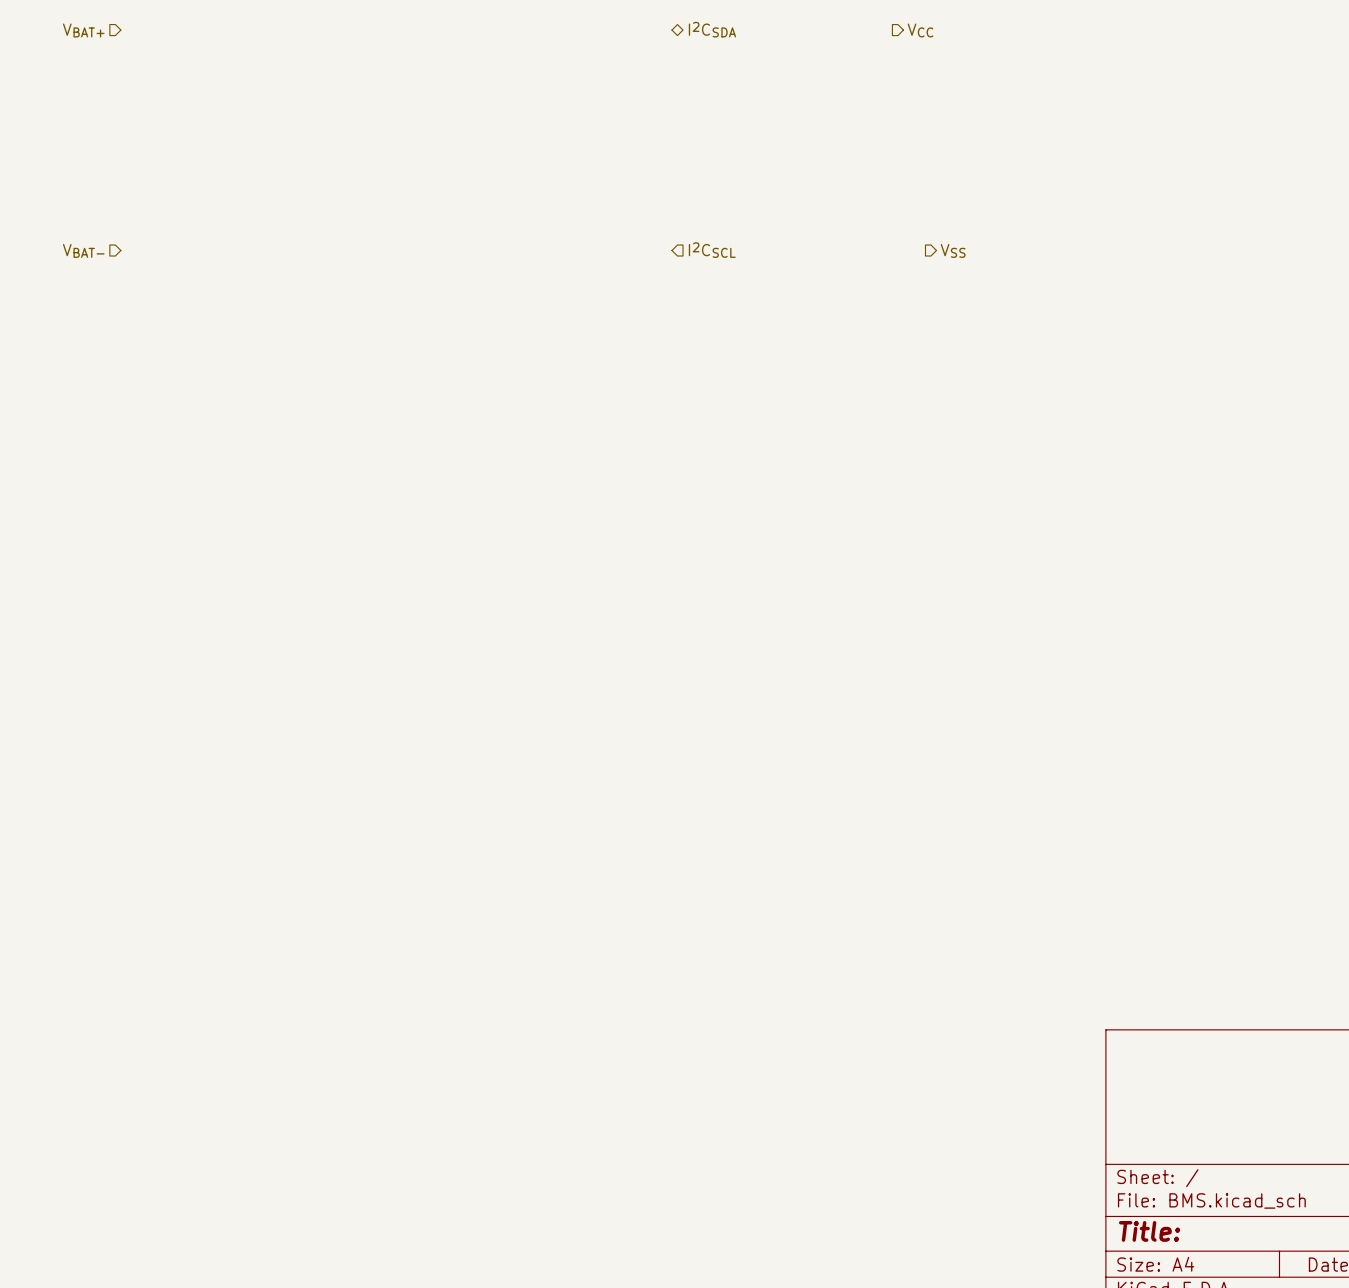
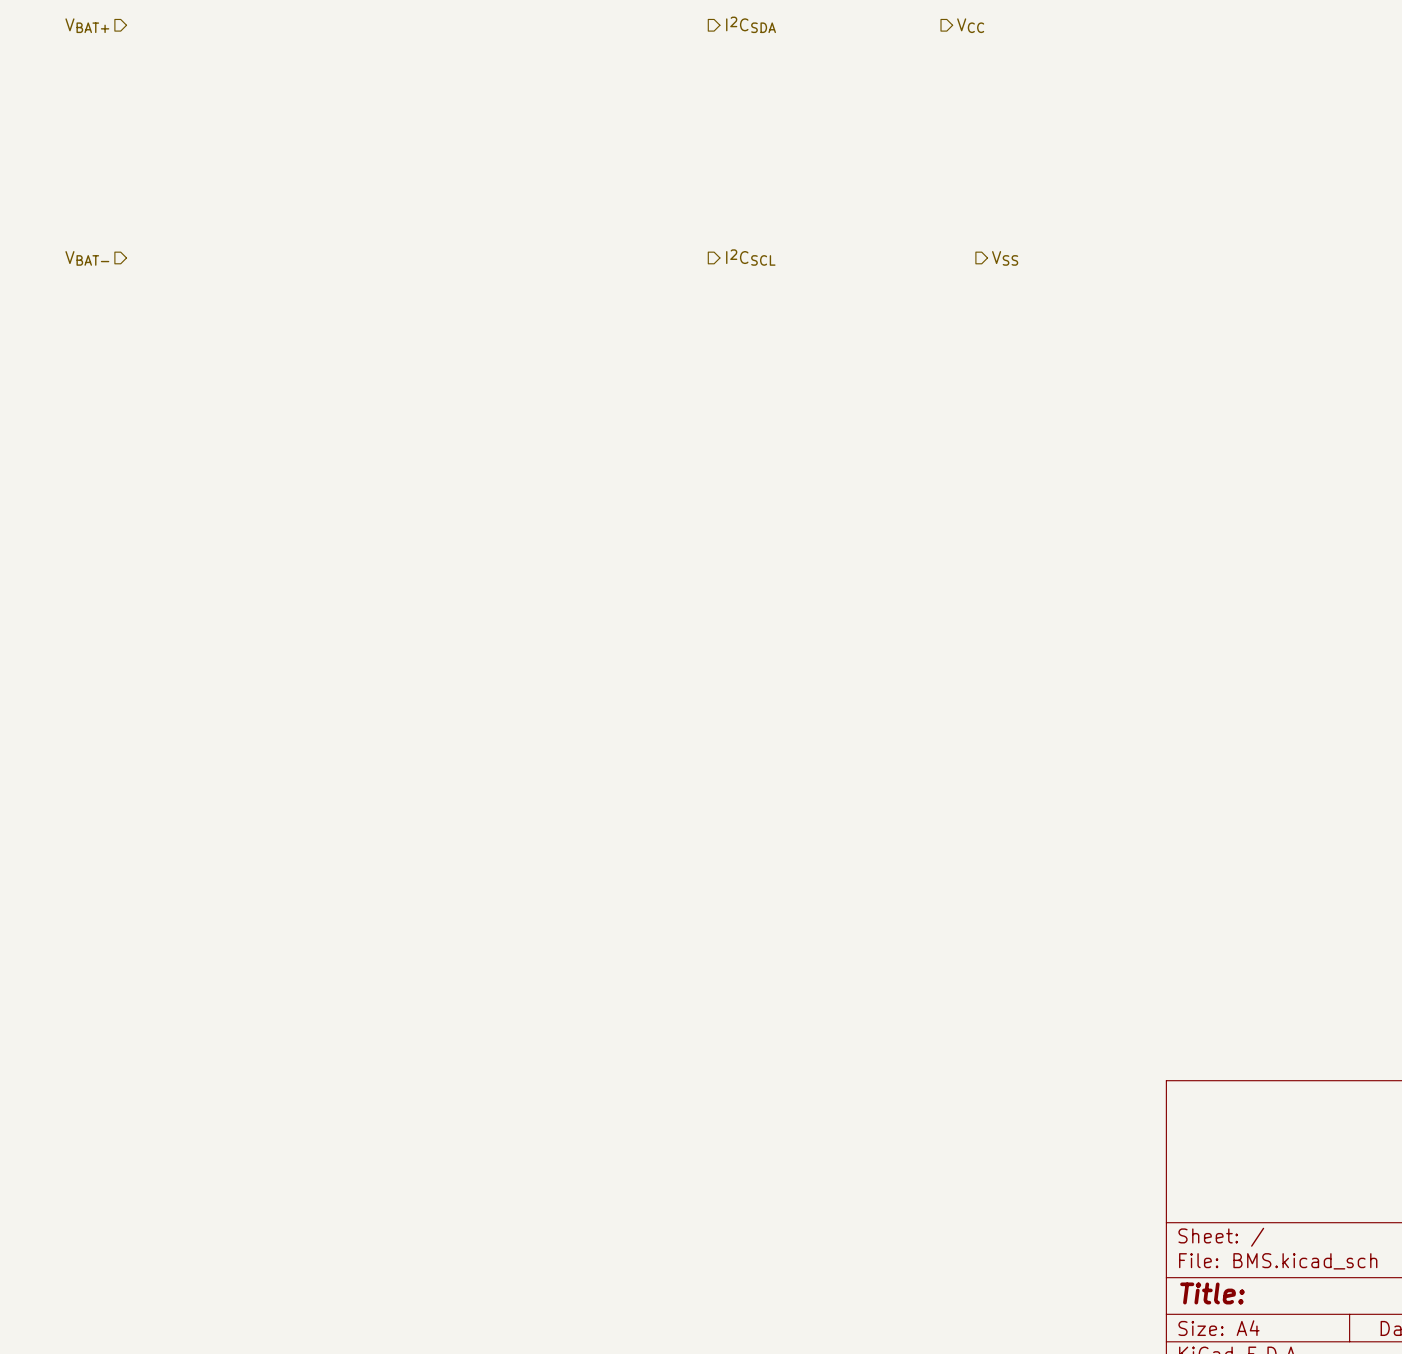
hierarchical label shape: bidirectional (712, 29) -> output (751, 24)
hierarchical label shape: input (712, 250) -> output (750, 257)

